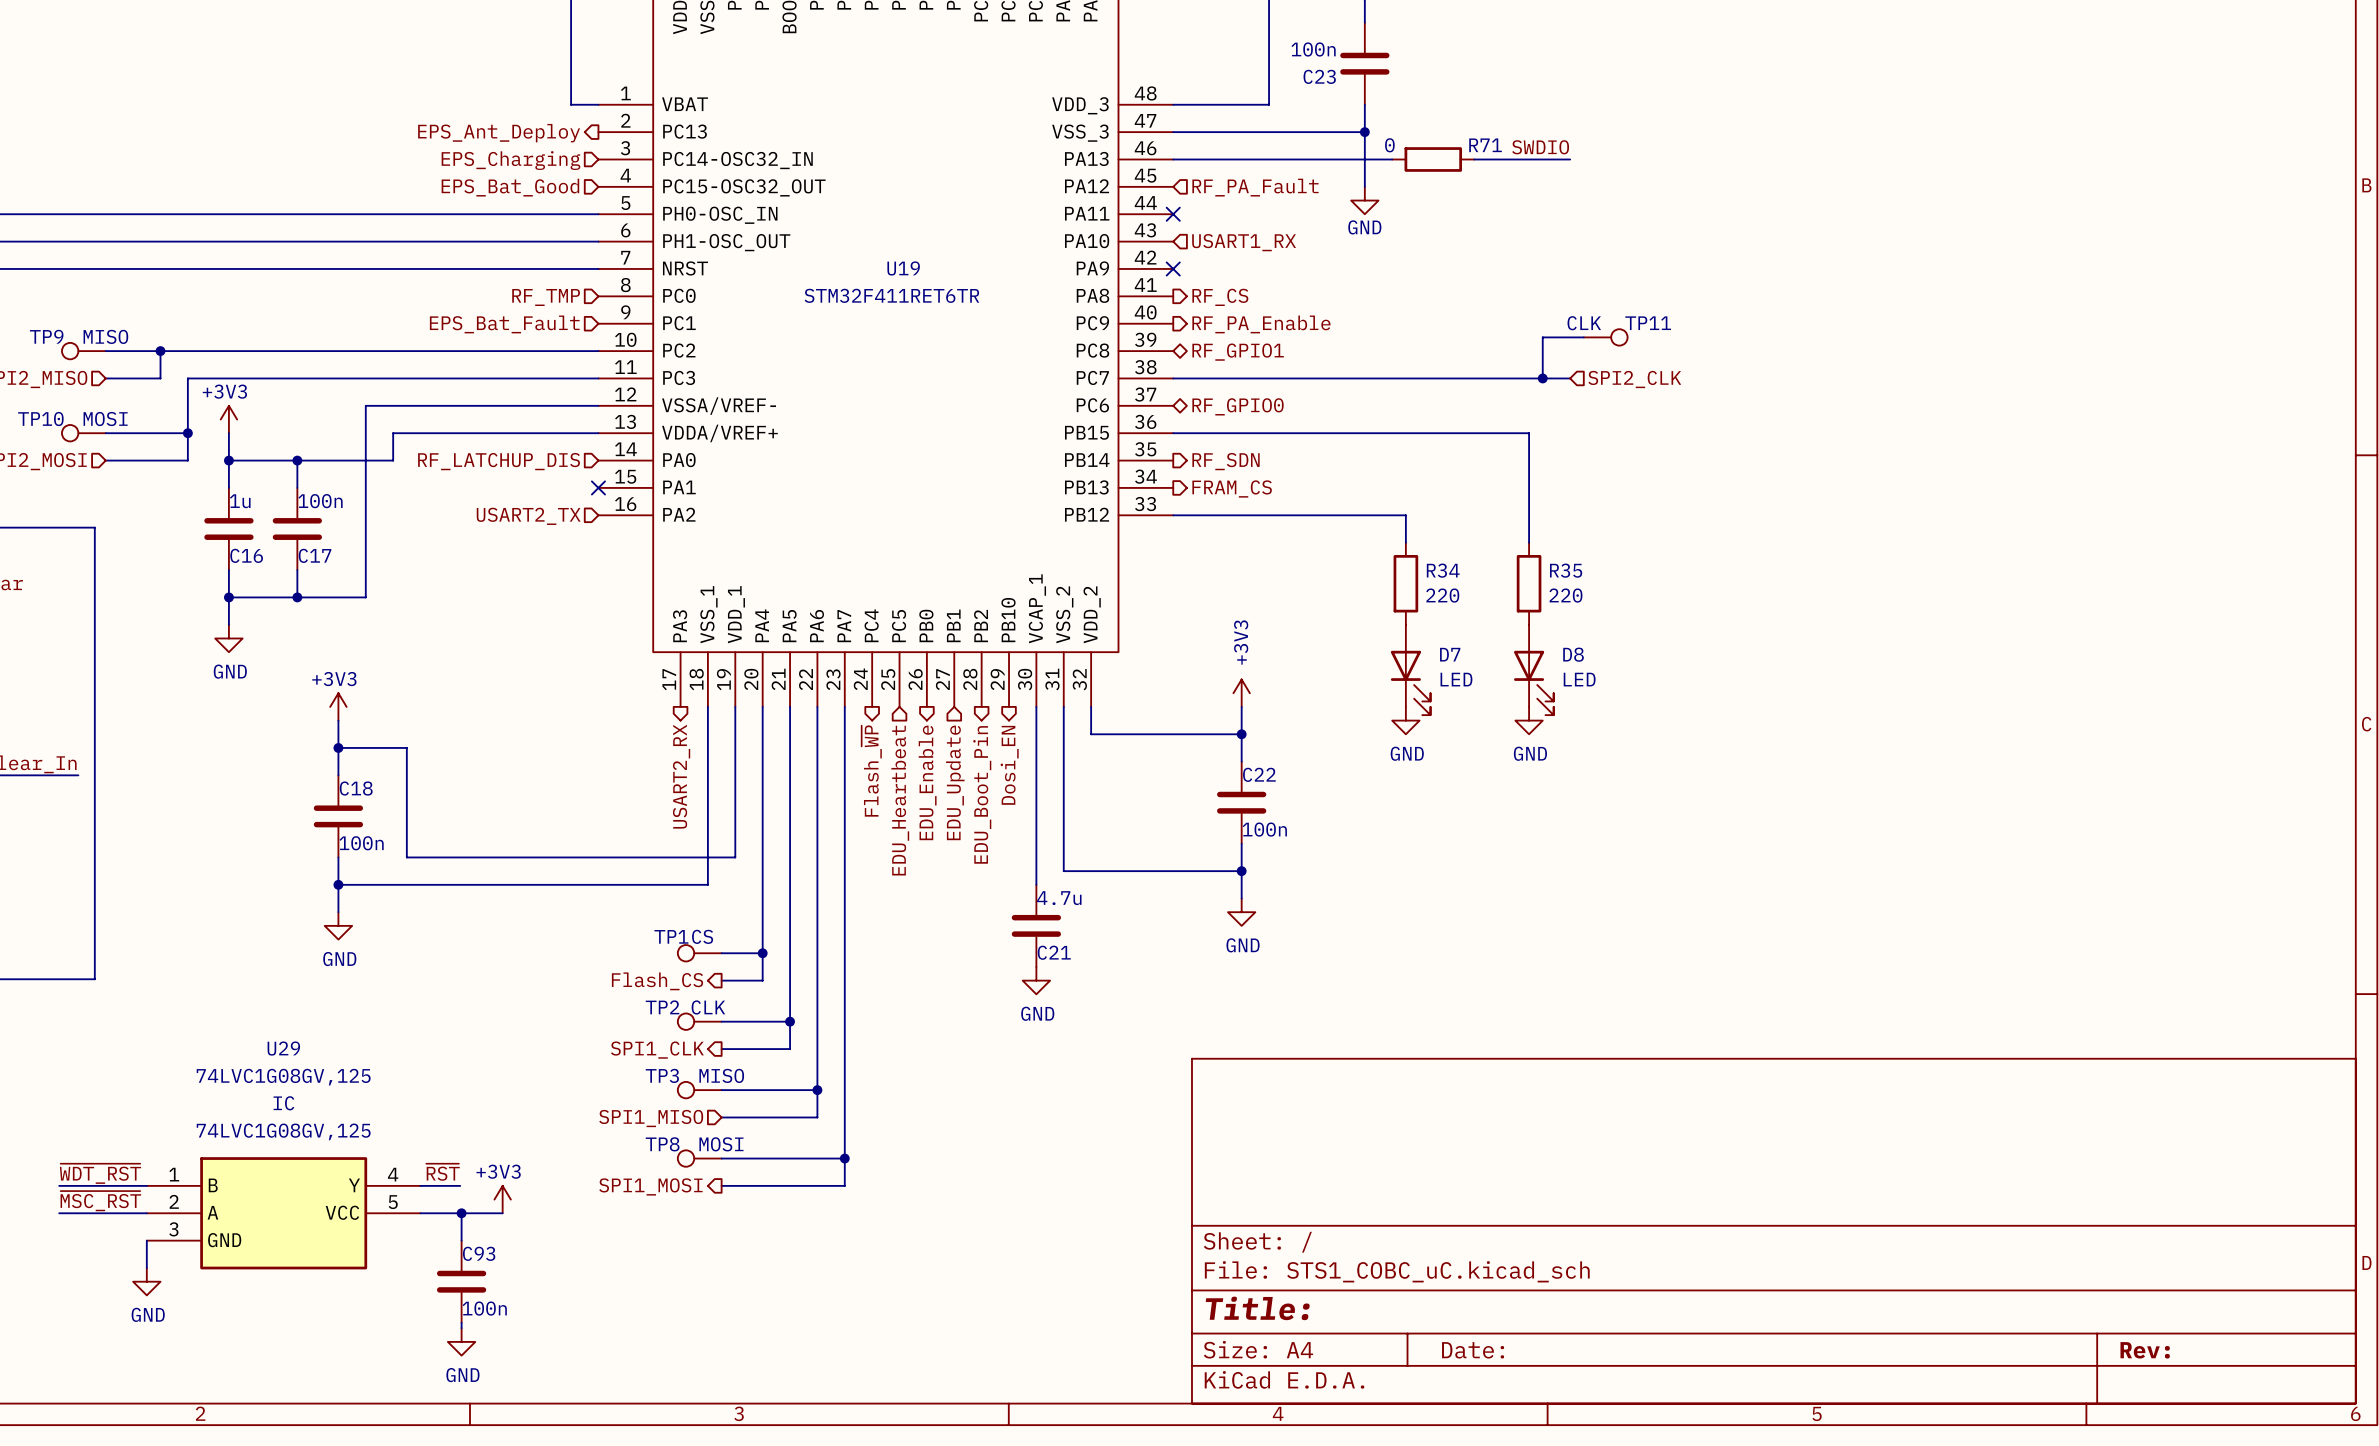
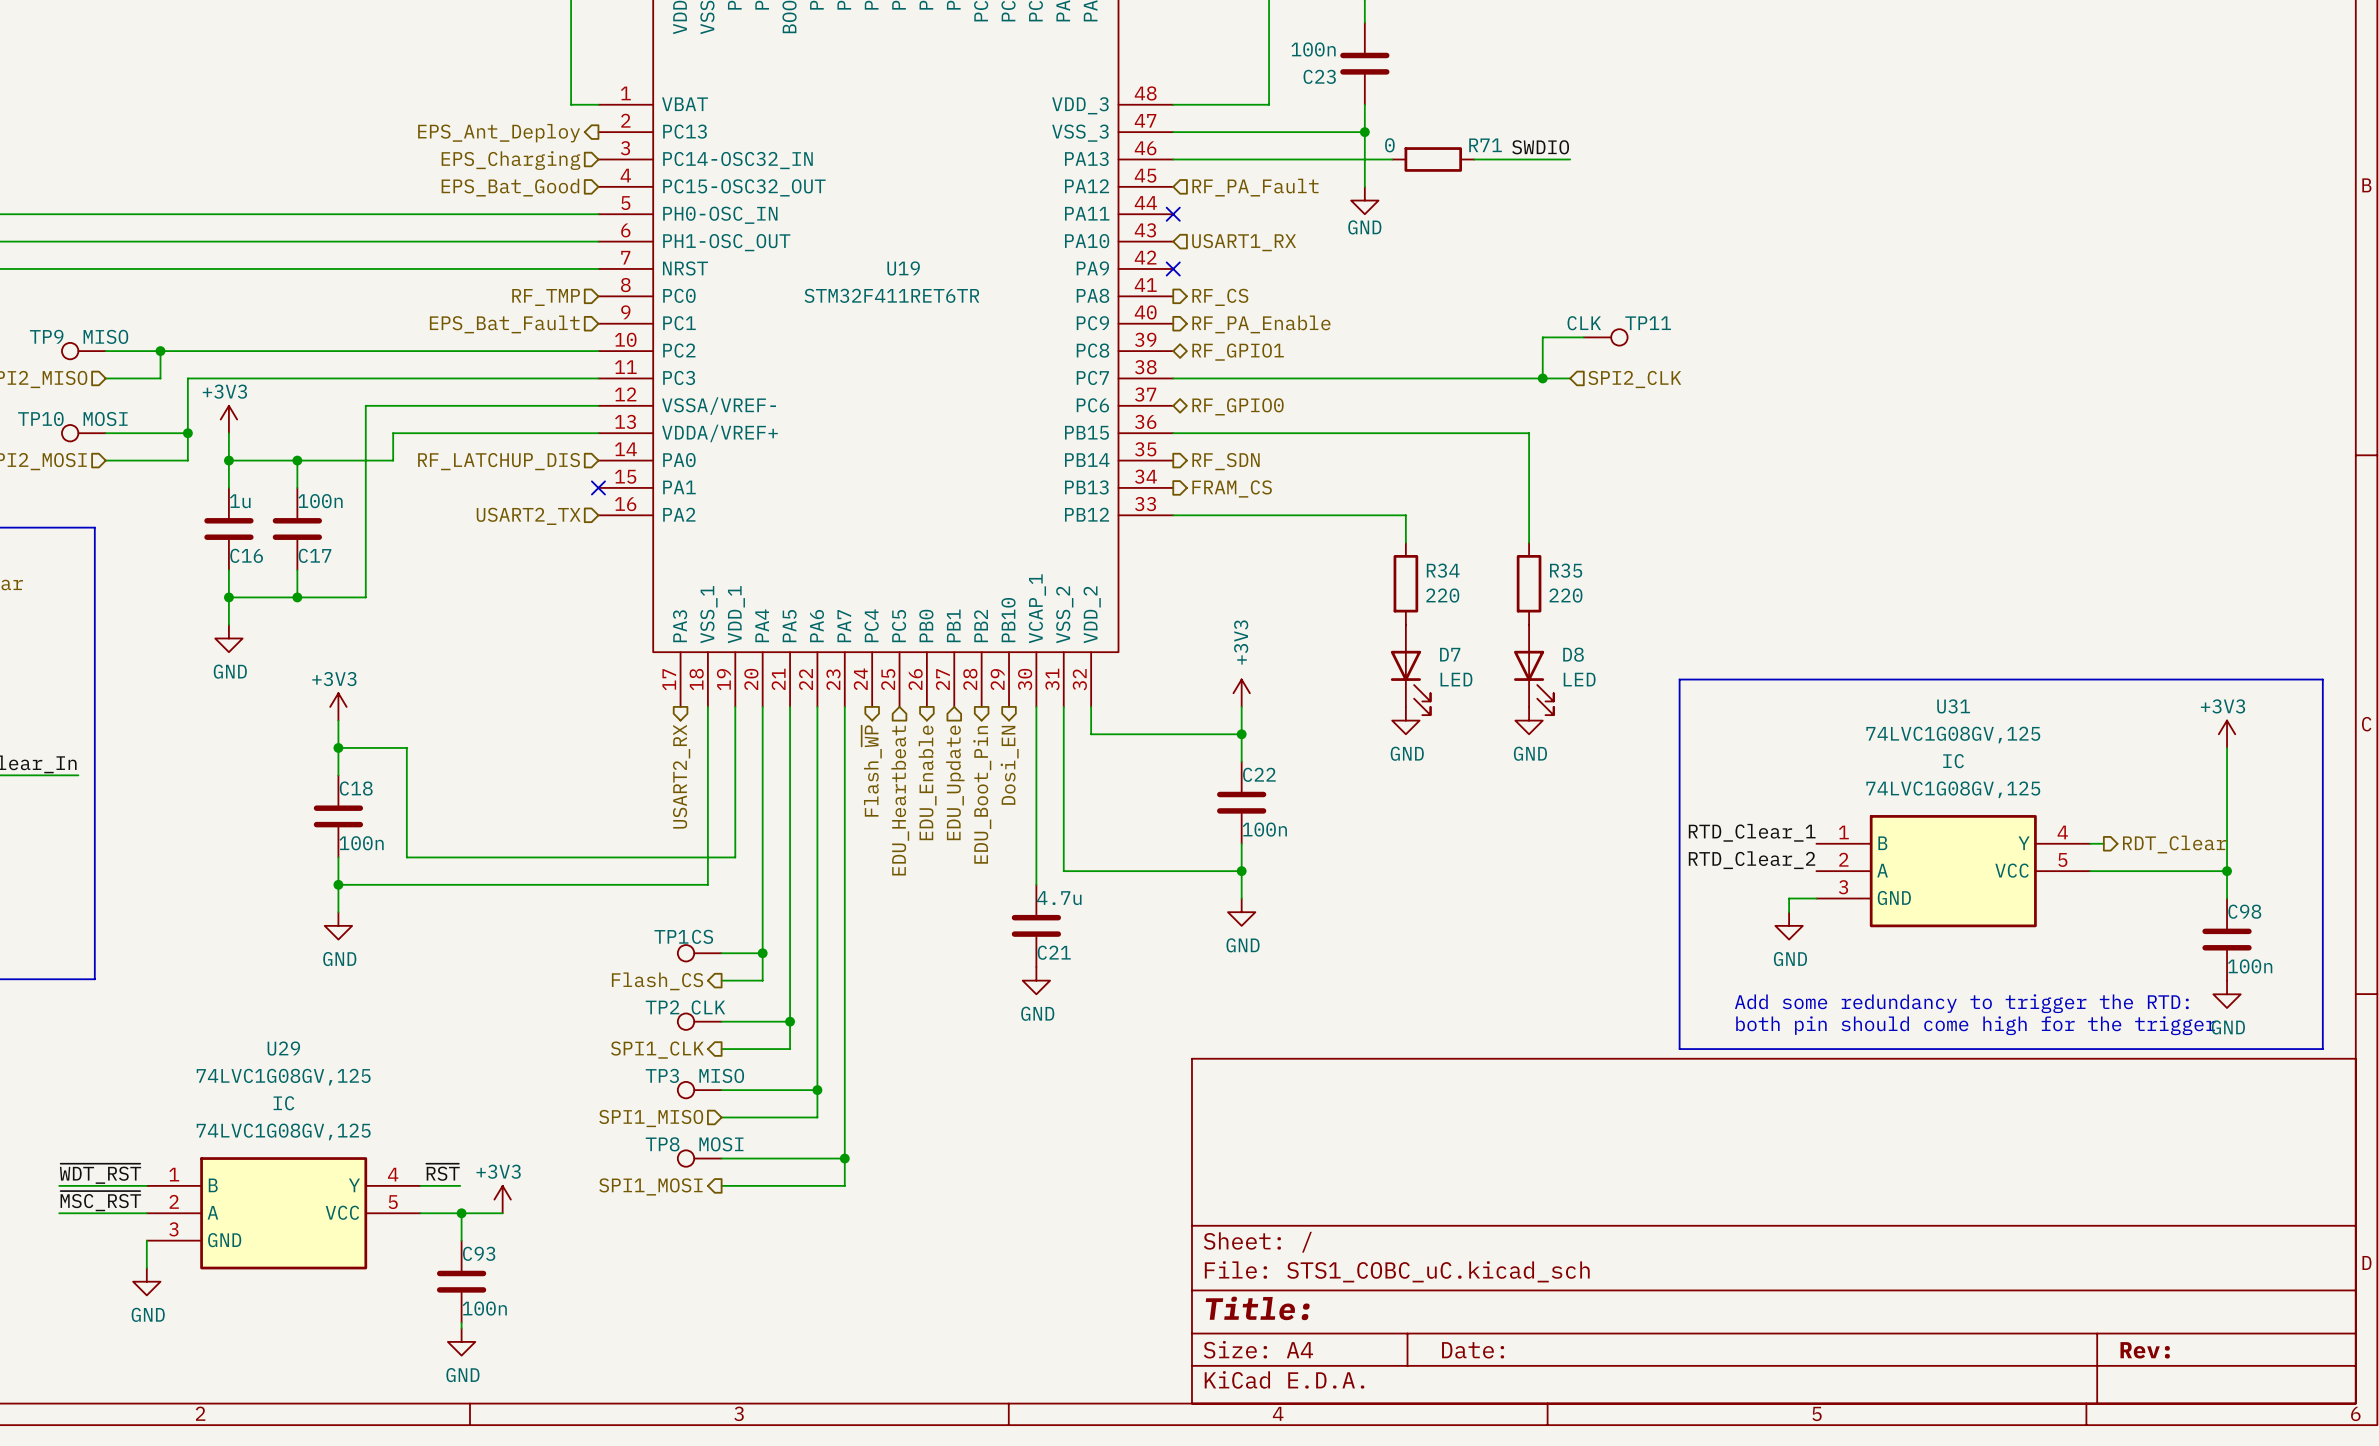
line: none -> (1679, 679) (2322, 679) (2322, 1049) (1679, 1049) (1679, 679)
power symbol: none -> +3V3 (2227, 734)
wire: none -> (2227, 747) (2227, 898)
label: none -> RTD_Clear_1 (1752, 832)
wire: none -> (2090, 843) (2103, 843)
hierarchical label: none -> RDT_Clear (2174, 844)
label: none -> RTD_Clear_2 (1752, 860)
U31: none -> 74LVC1G08GV,125 (1953, 871)
wire: none -> (2090, 871) (2227, 871)
junction: none -> (2227, 871)
wire: none -> (1816, 898) (1789, 898) (1789, 912)
power symbol: none -> GND (1789, 925)
C98: none -> 100n (2227, 939)
power symbol: none -> GND (2227, 994)
text: none -> Add some redundancy to trigger the RTD: (1961, 1003)
text: none -> both pin should come high for the trigger (1976, 1025)

